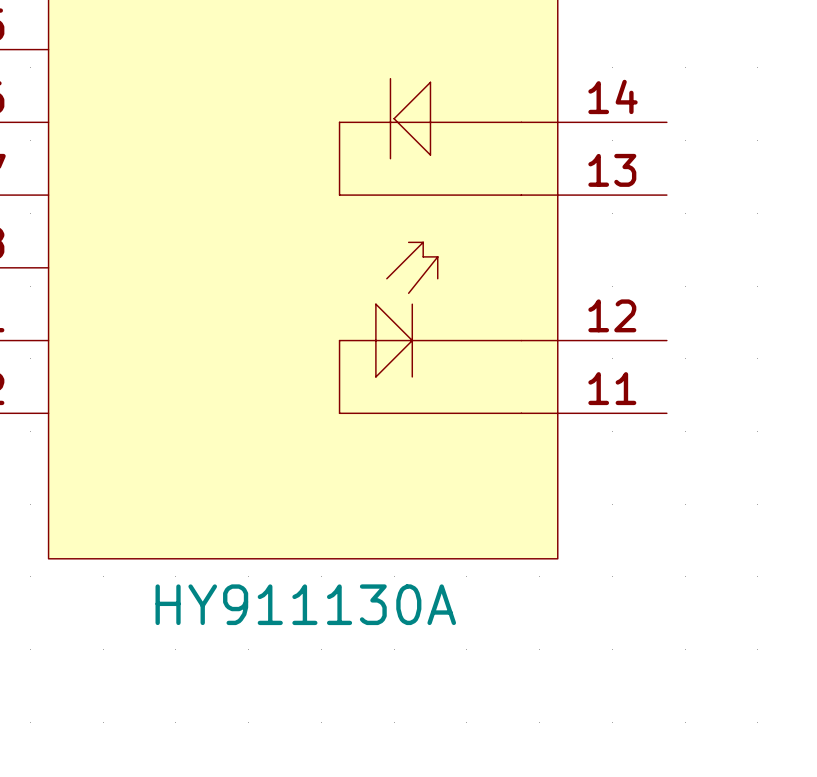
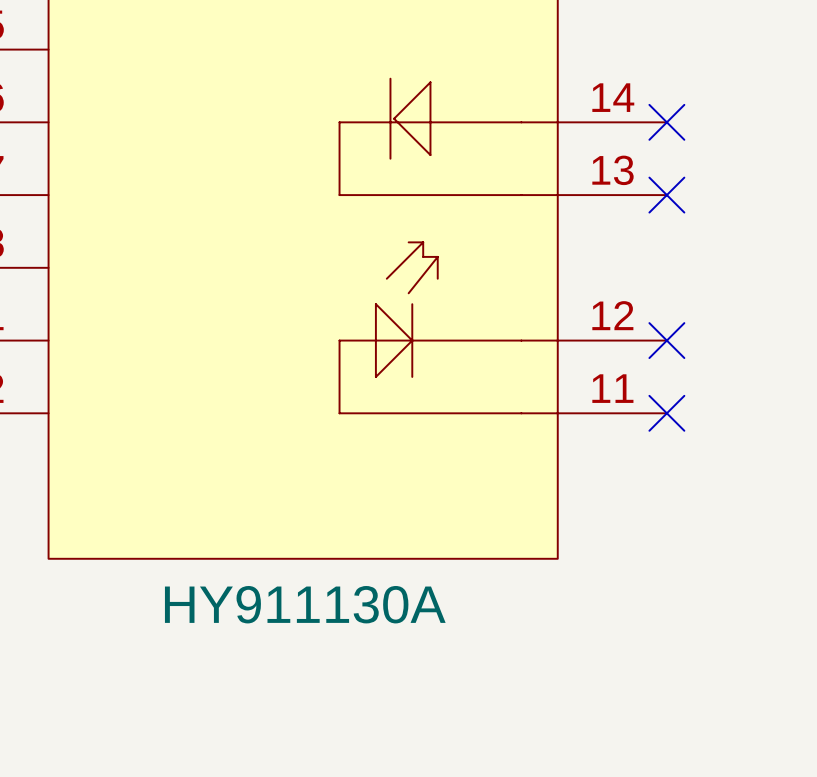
no-connect mark: none -> (666, 122)
no-connect mark: none -> (666, 195)
no-connect mark: none -> (666, 340)
no-connect mark: none -> (666, 413)

